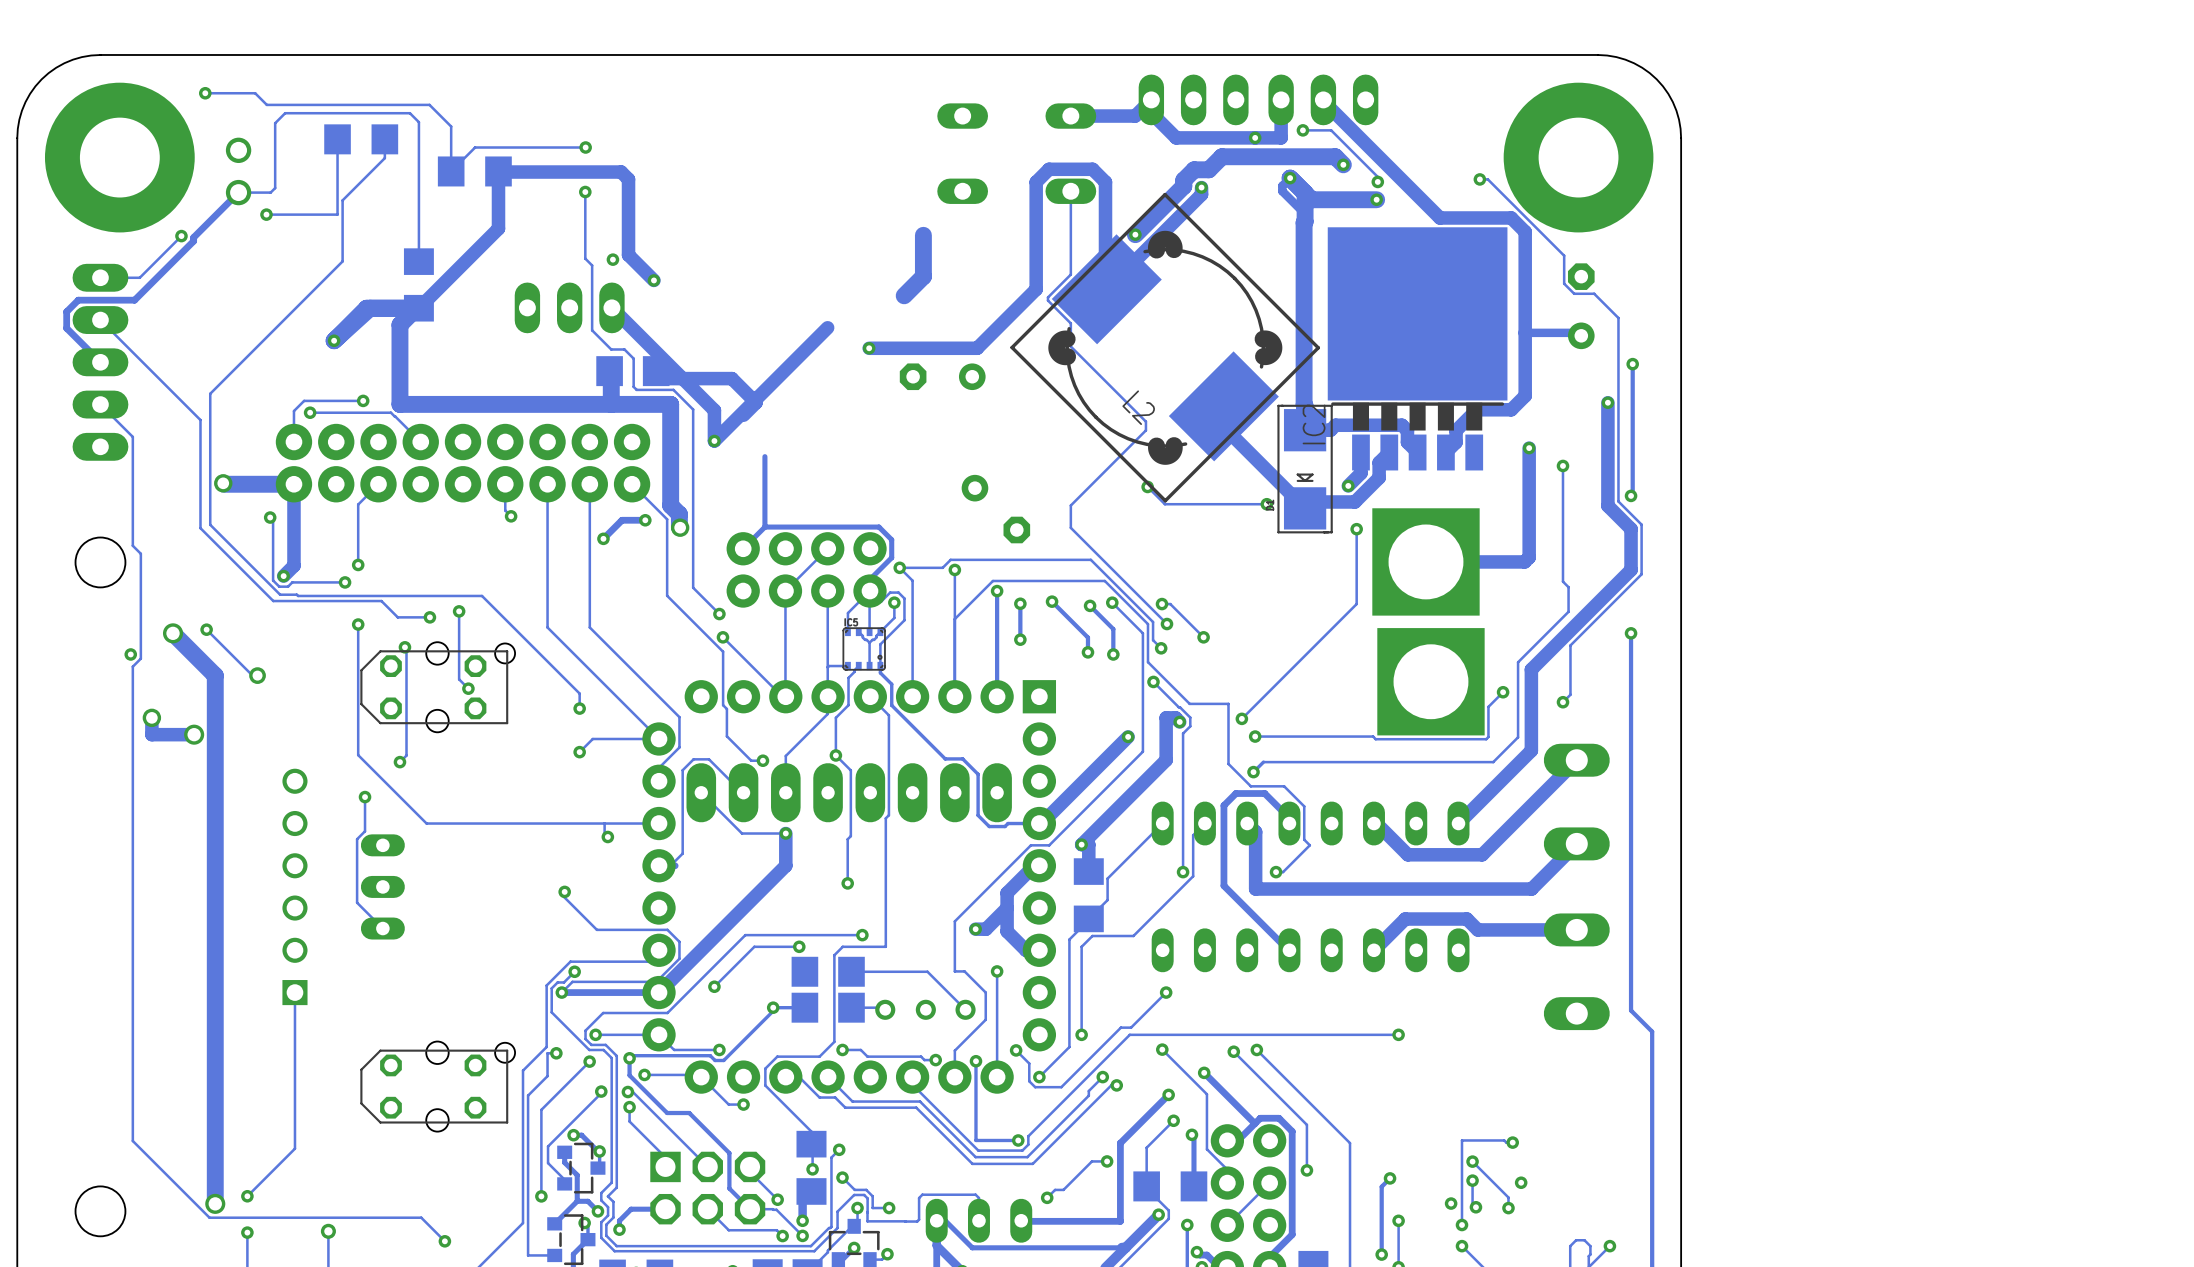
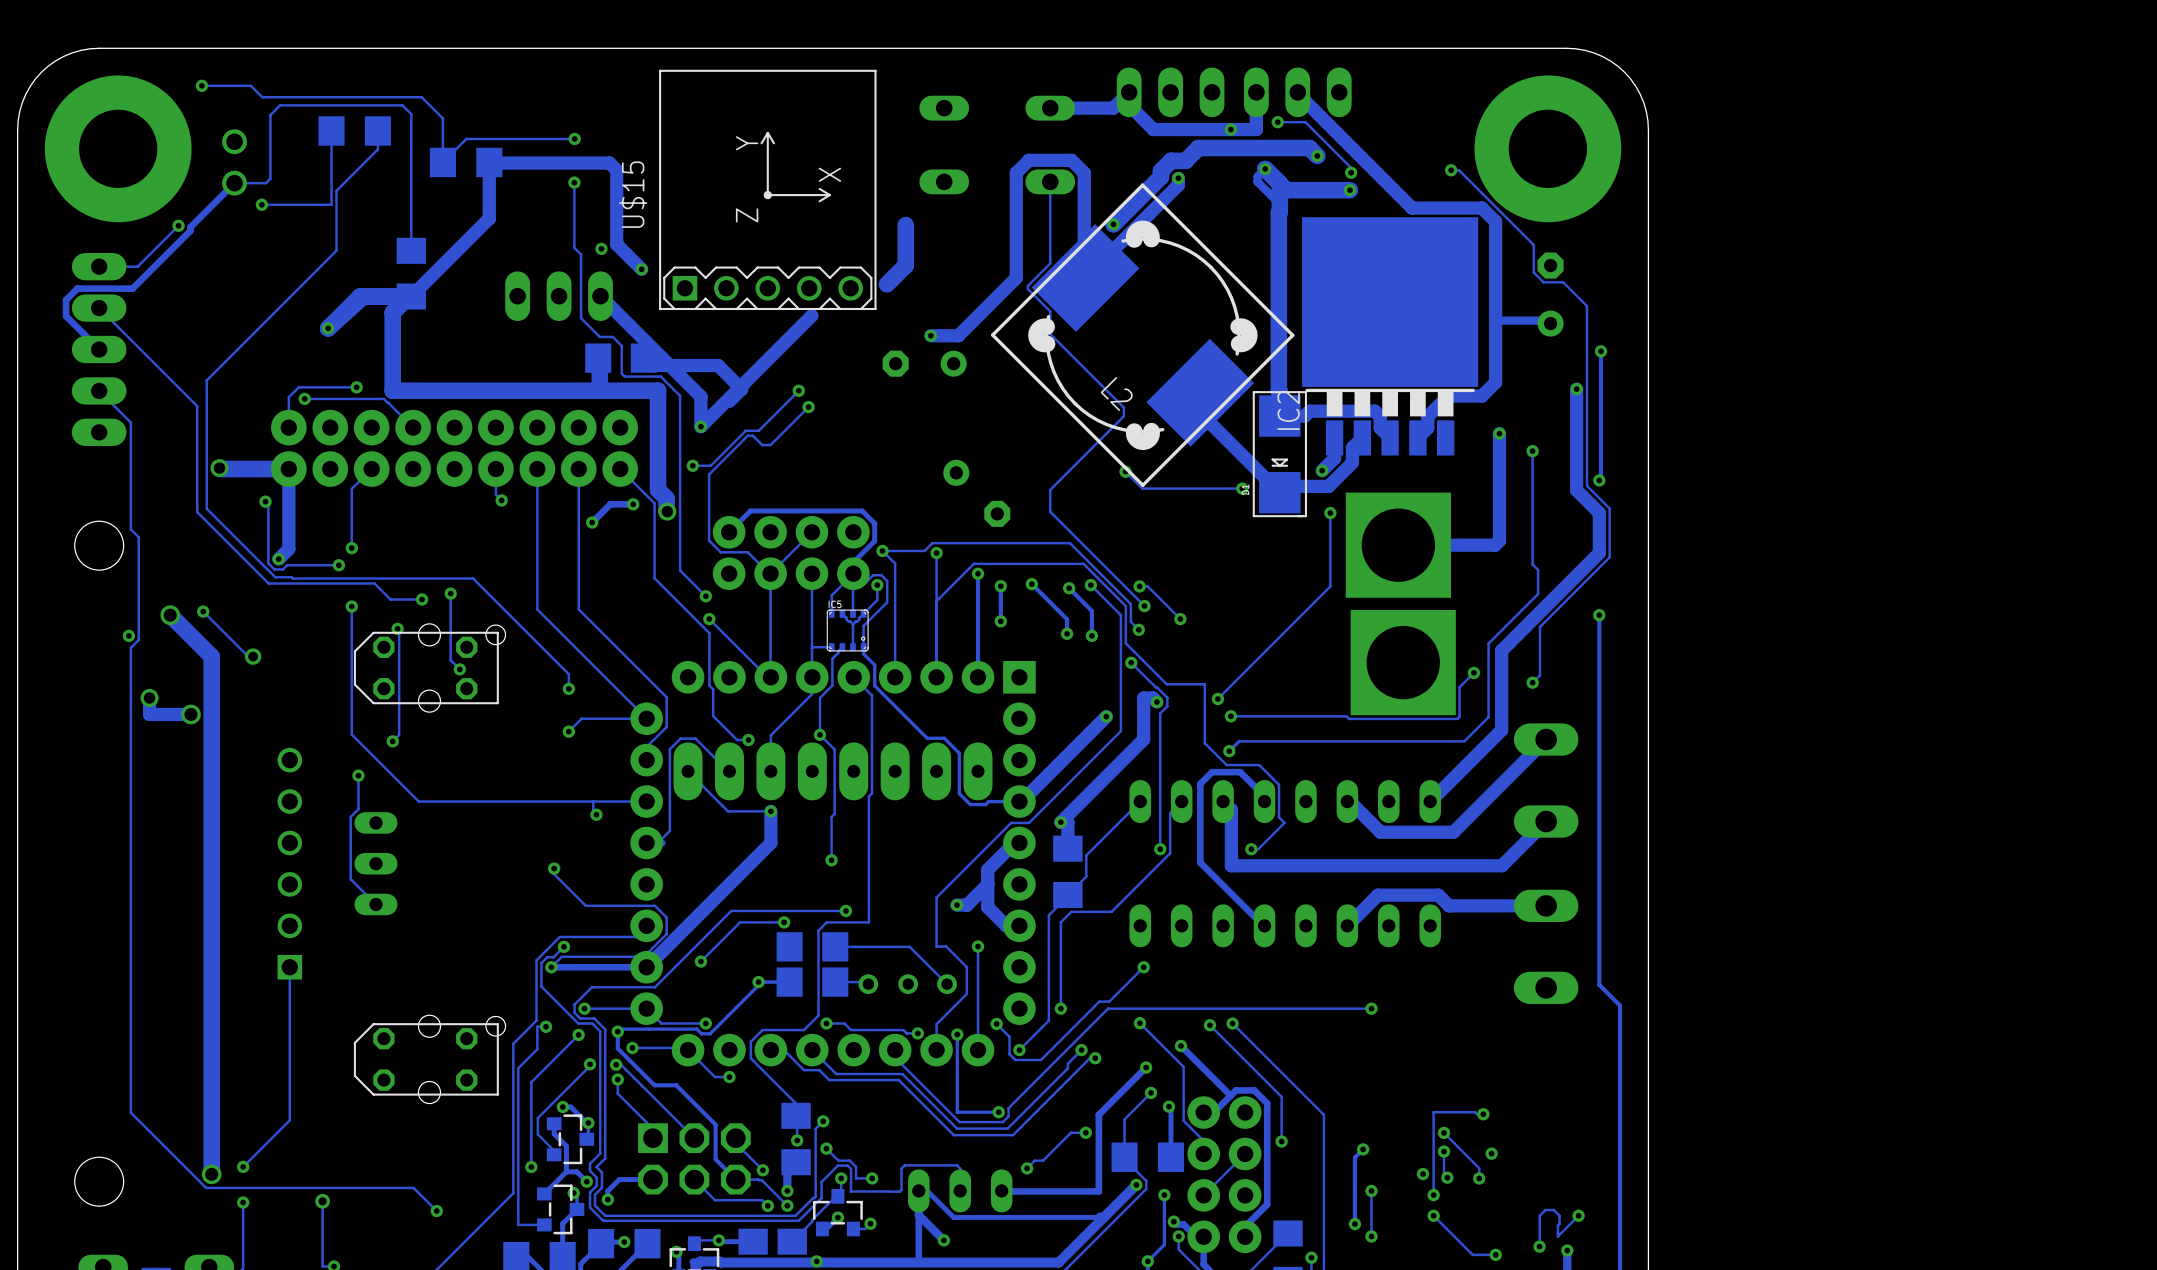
U$15: none -> (767, 189)
via: (869, 348) -> none
track: (949, 348) (869, 348) -> none
via: none -> (930, 335)
track: none -> (798, 390) (758, 430) (745, 430) (710, 465) (692, 465)
via: none -> (798, 390)
track: none -> (808, 407) (770, 445) (762, 445) (753, 435) (747, 435) (709, 474) (709, 540) (720, 552) (747, 552) (770, 575)
via: none -> (808, 407)
track: (764, 456) (764, 527) -> none
via: none -> (692, 465)

